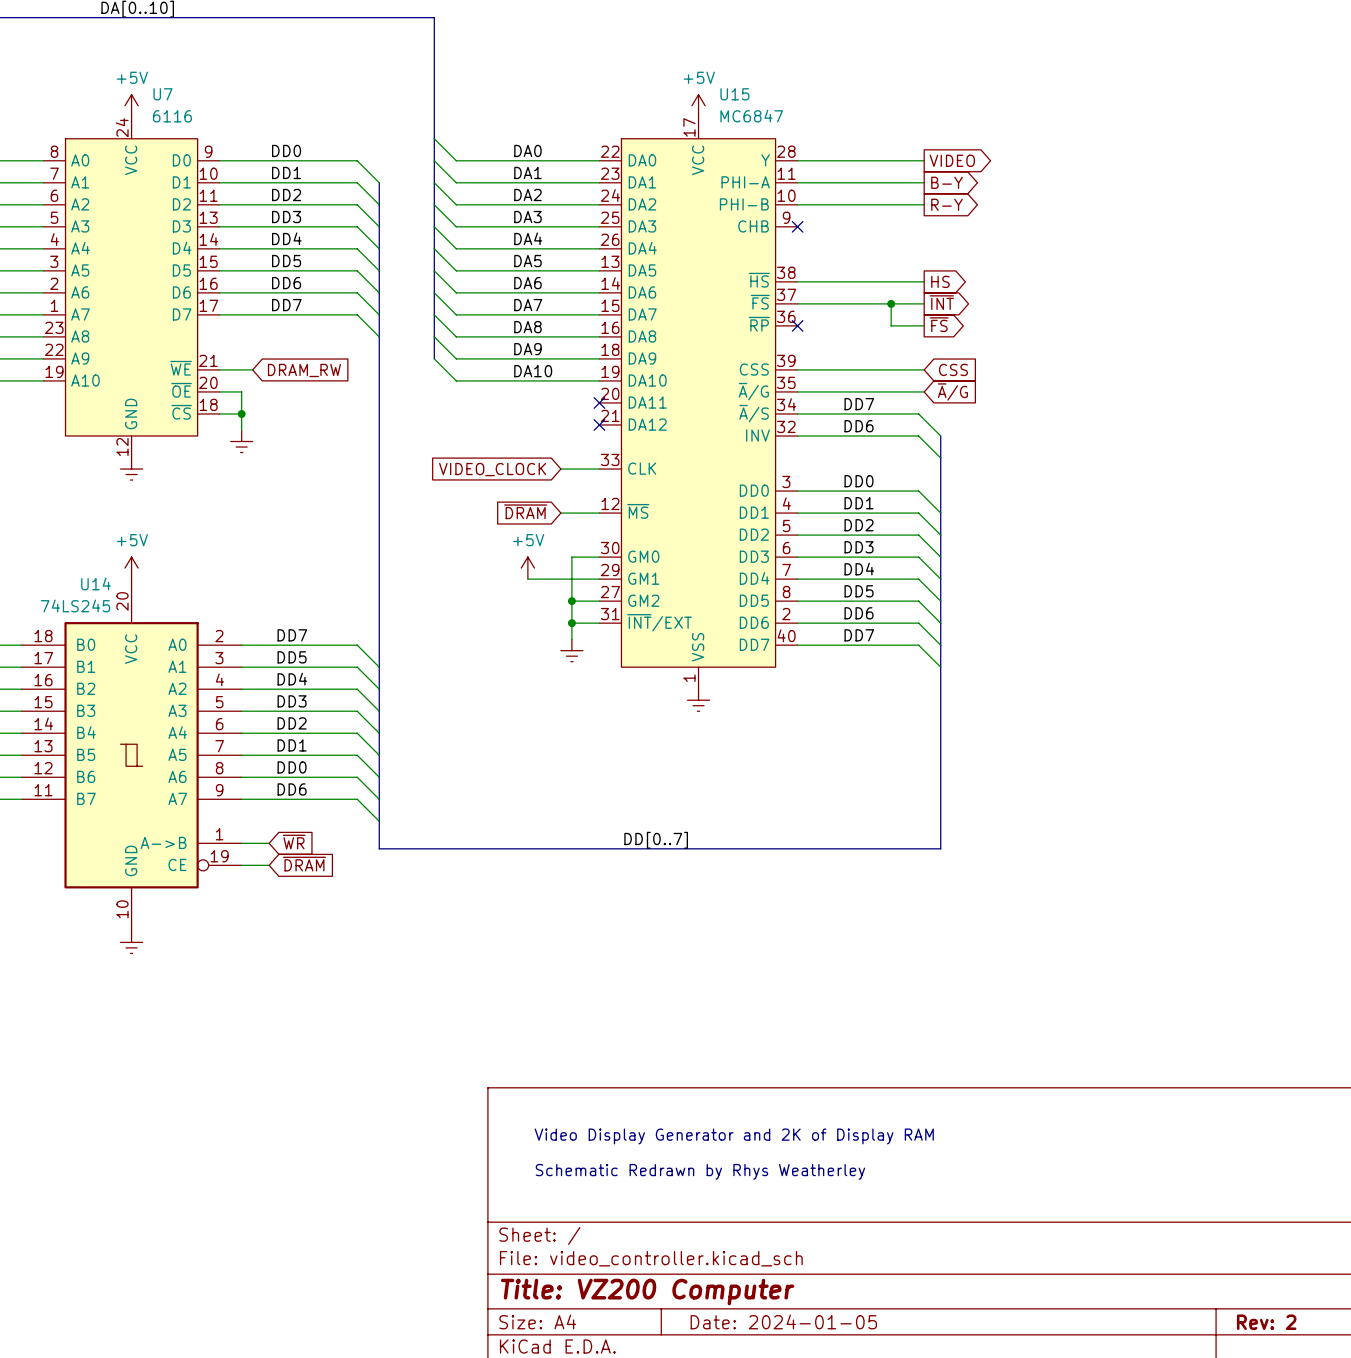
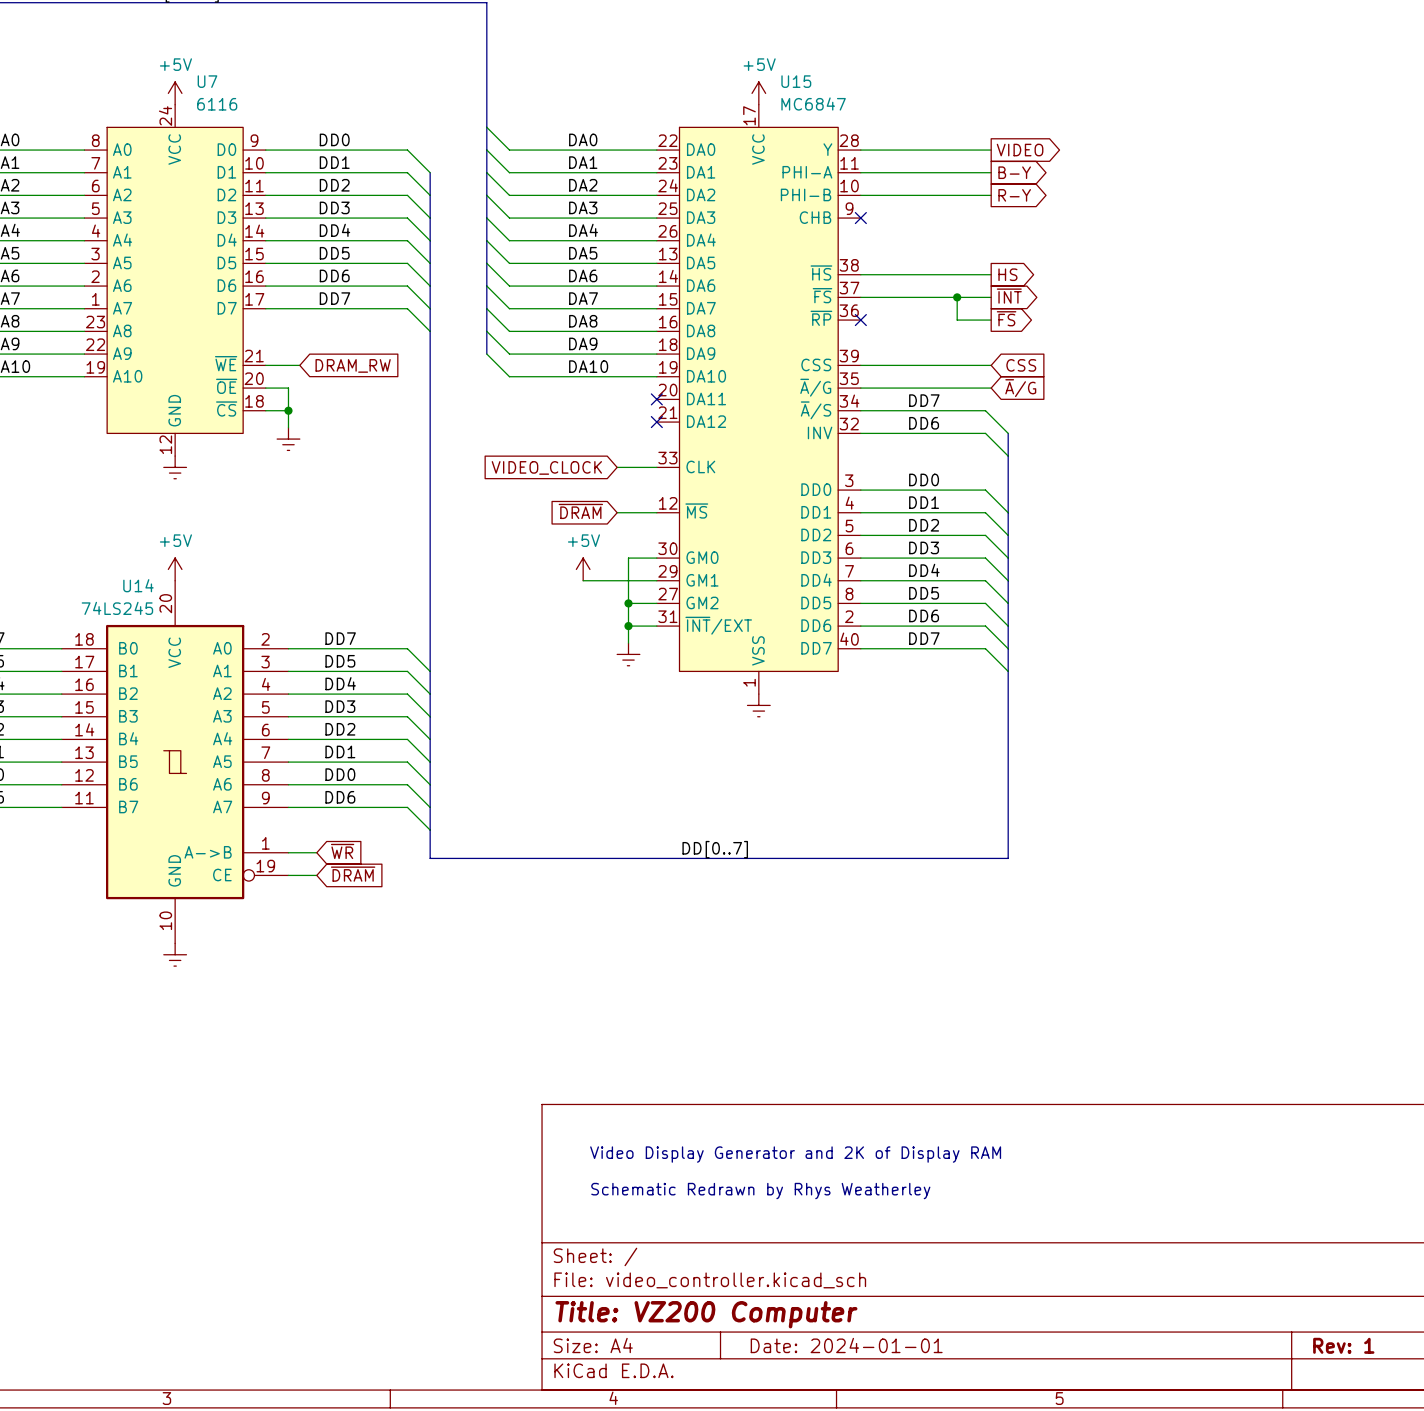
title block: Date: 2024-01-05 (783, 1321) -> Date: 2024-01-01 (846, 1345)
title block: Rev: 2 (1266, 1322) -> Rev: 1 (1343, 1345)

